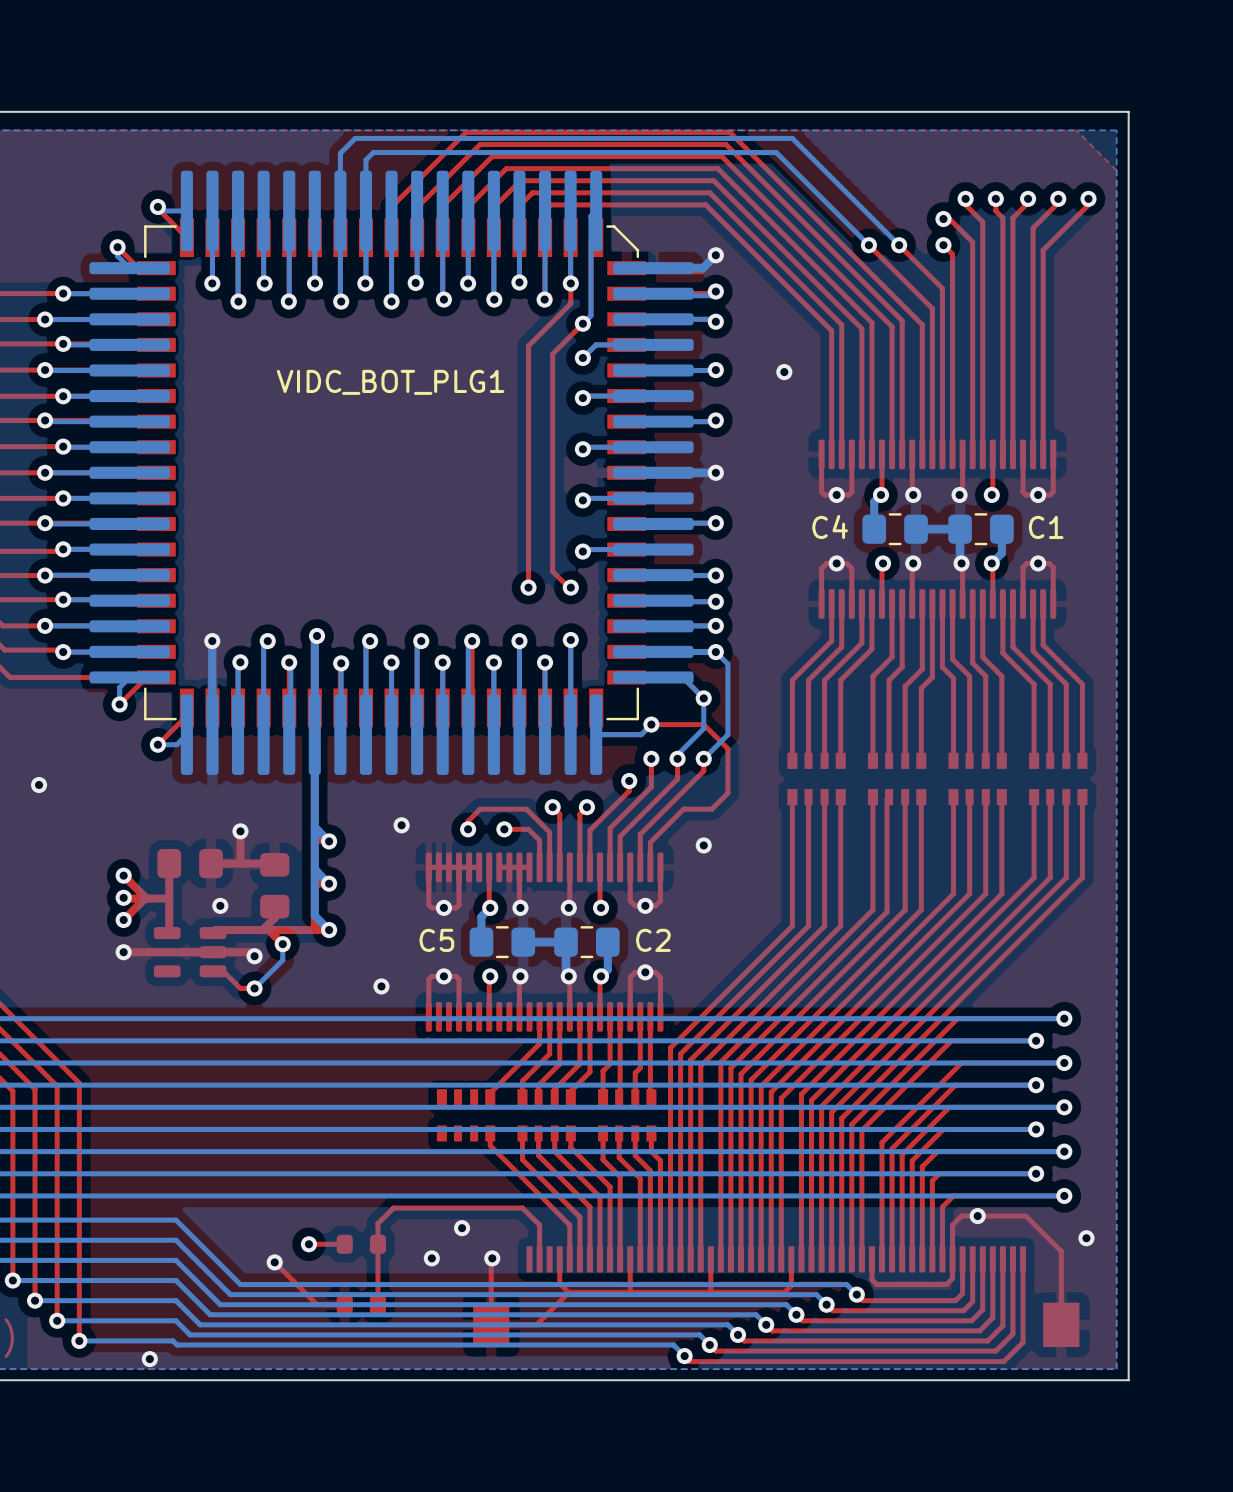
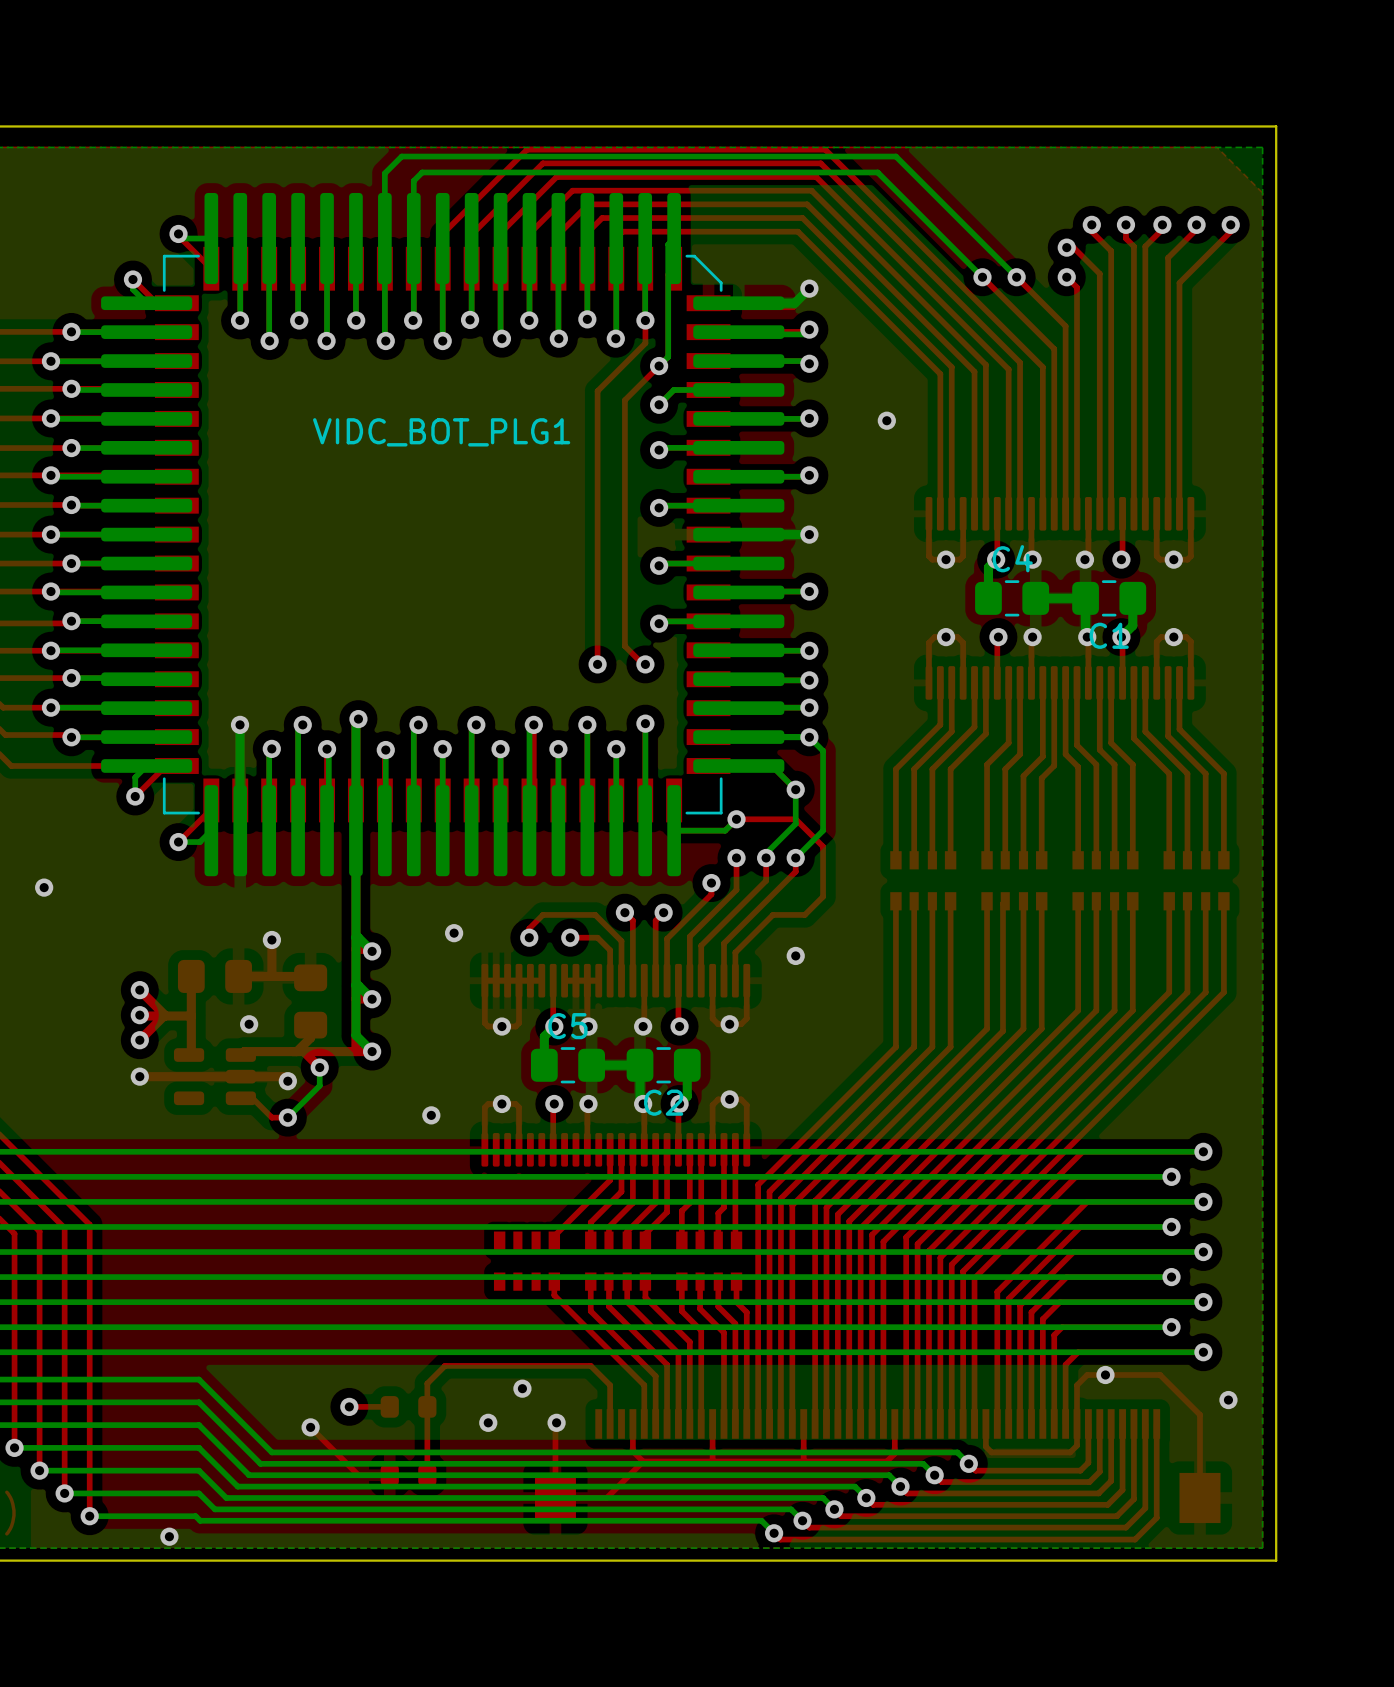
C4 name position: C4 (830, 526) -> C4 (1012, 558)
C1 name position: C1 (1046, 527) -> C1 (1109, 635)
C5 name position: C5 (436, 940) -> C5 (567, 1026)
C2 name position: C2 (653, 940) -> C2 (663, 1102)

